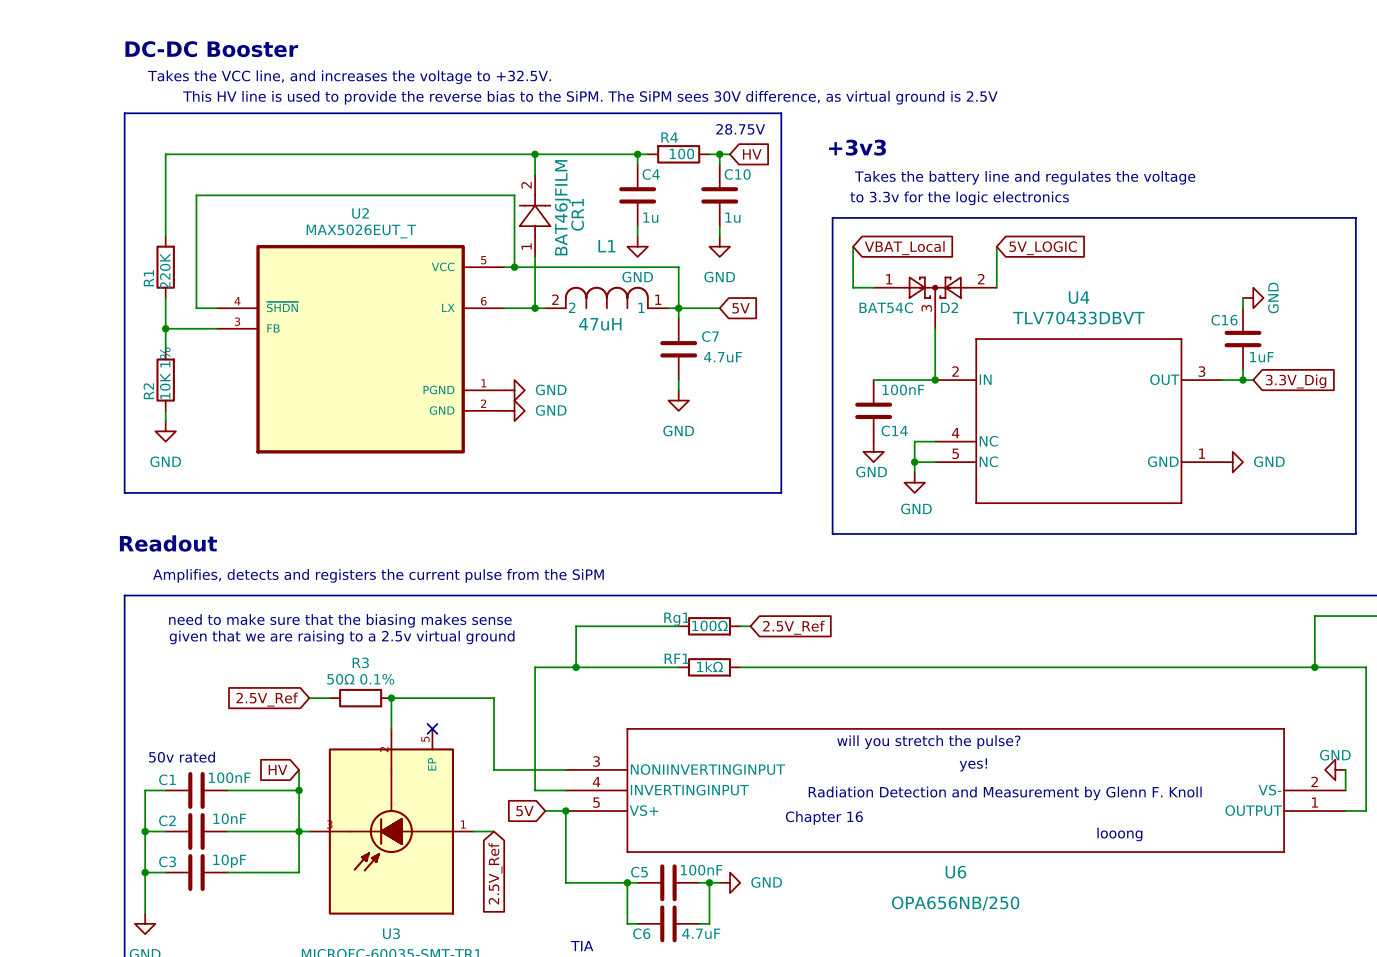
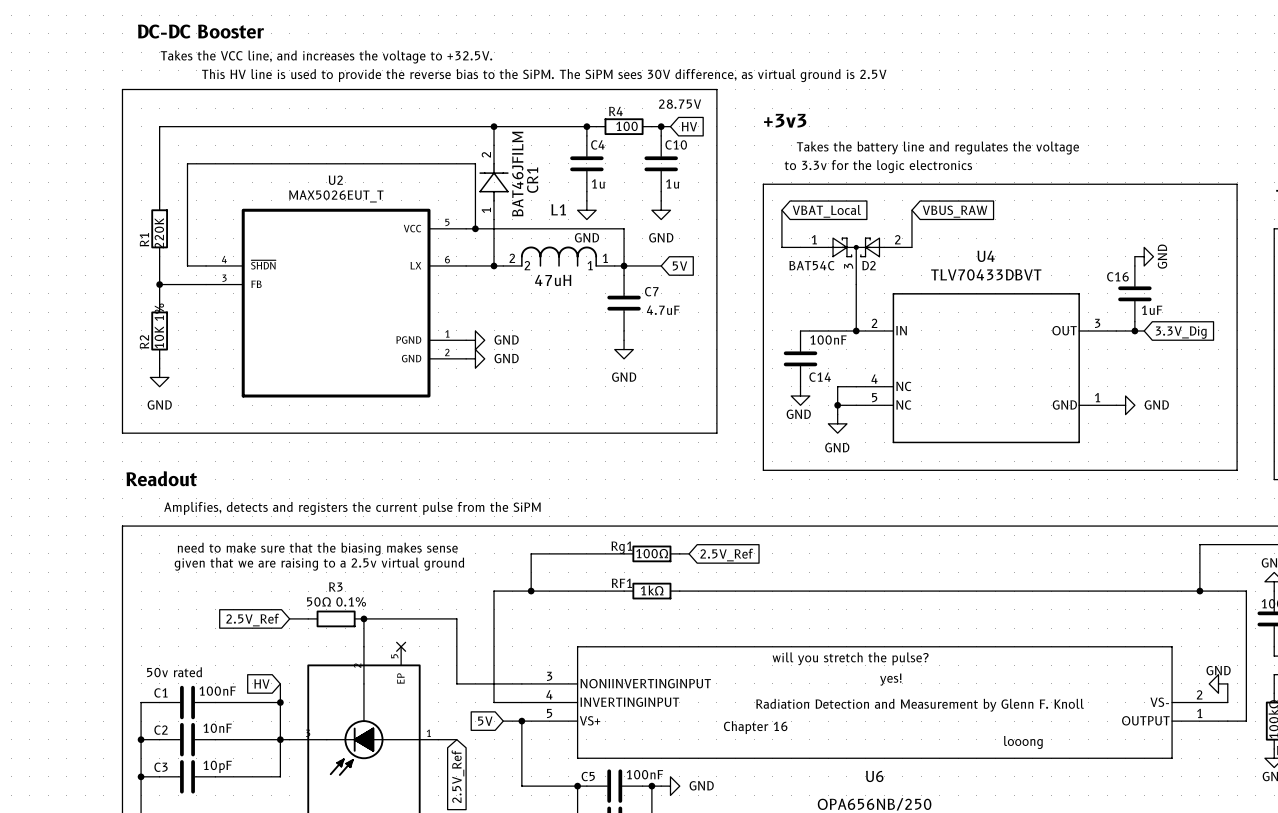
global label: 5V_LOGIC (1043, 248) -> VBUS_RAW (955, 211)

